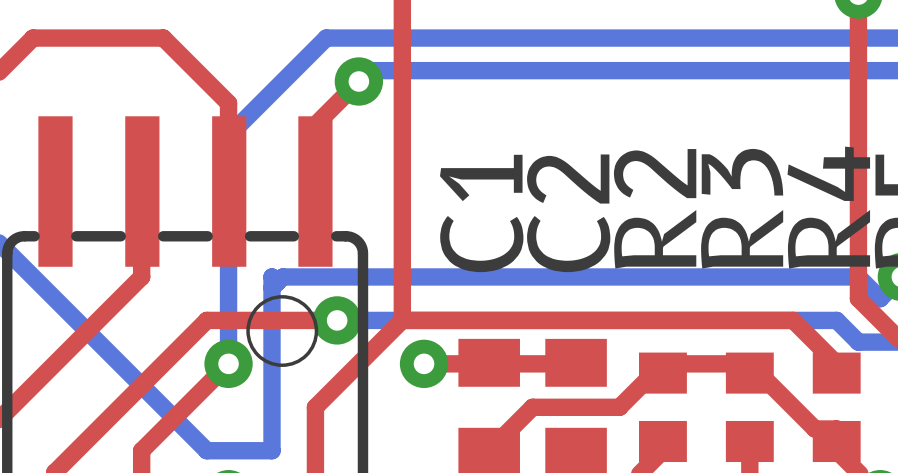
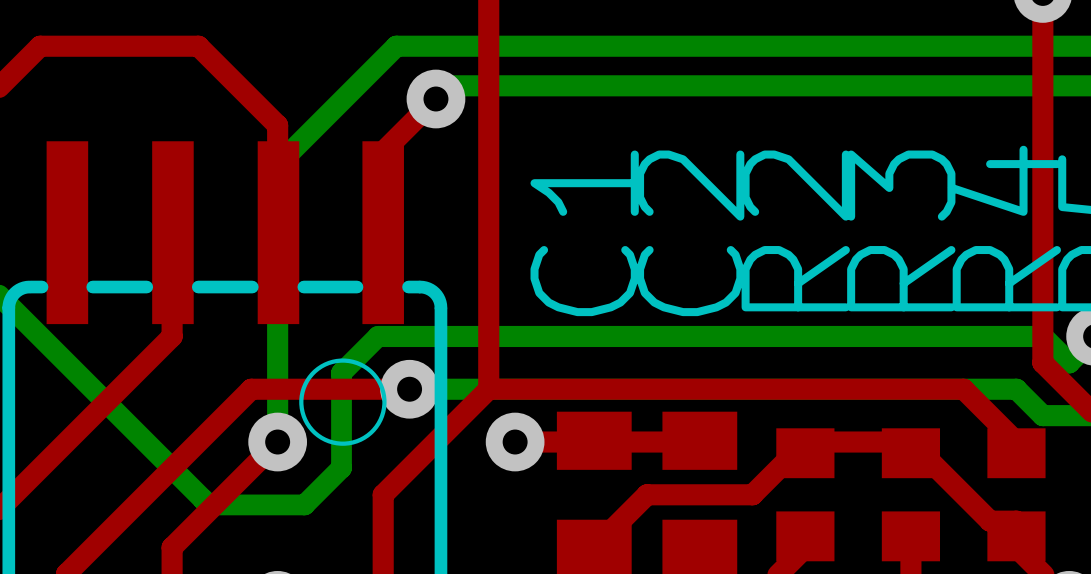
bottom track: (311, 276) (282, 276) (271, 287) -> none
bottom track: (277, 282) (271, 276) (271, 450) (206, 450) (171, 415) -> (378, 336) (341, 372) (341, 467) (304, 504) (208, 504)

